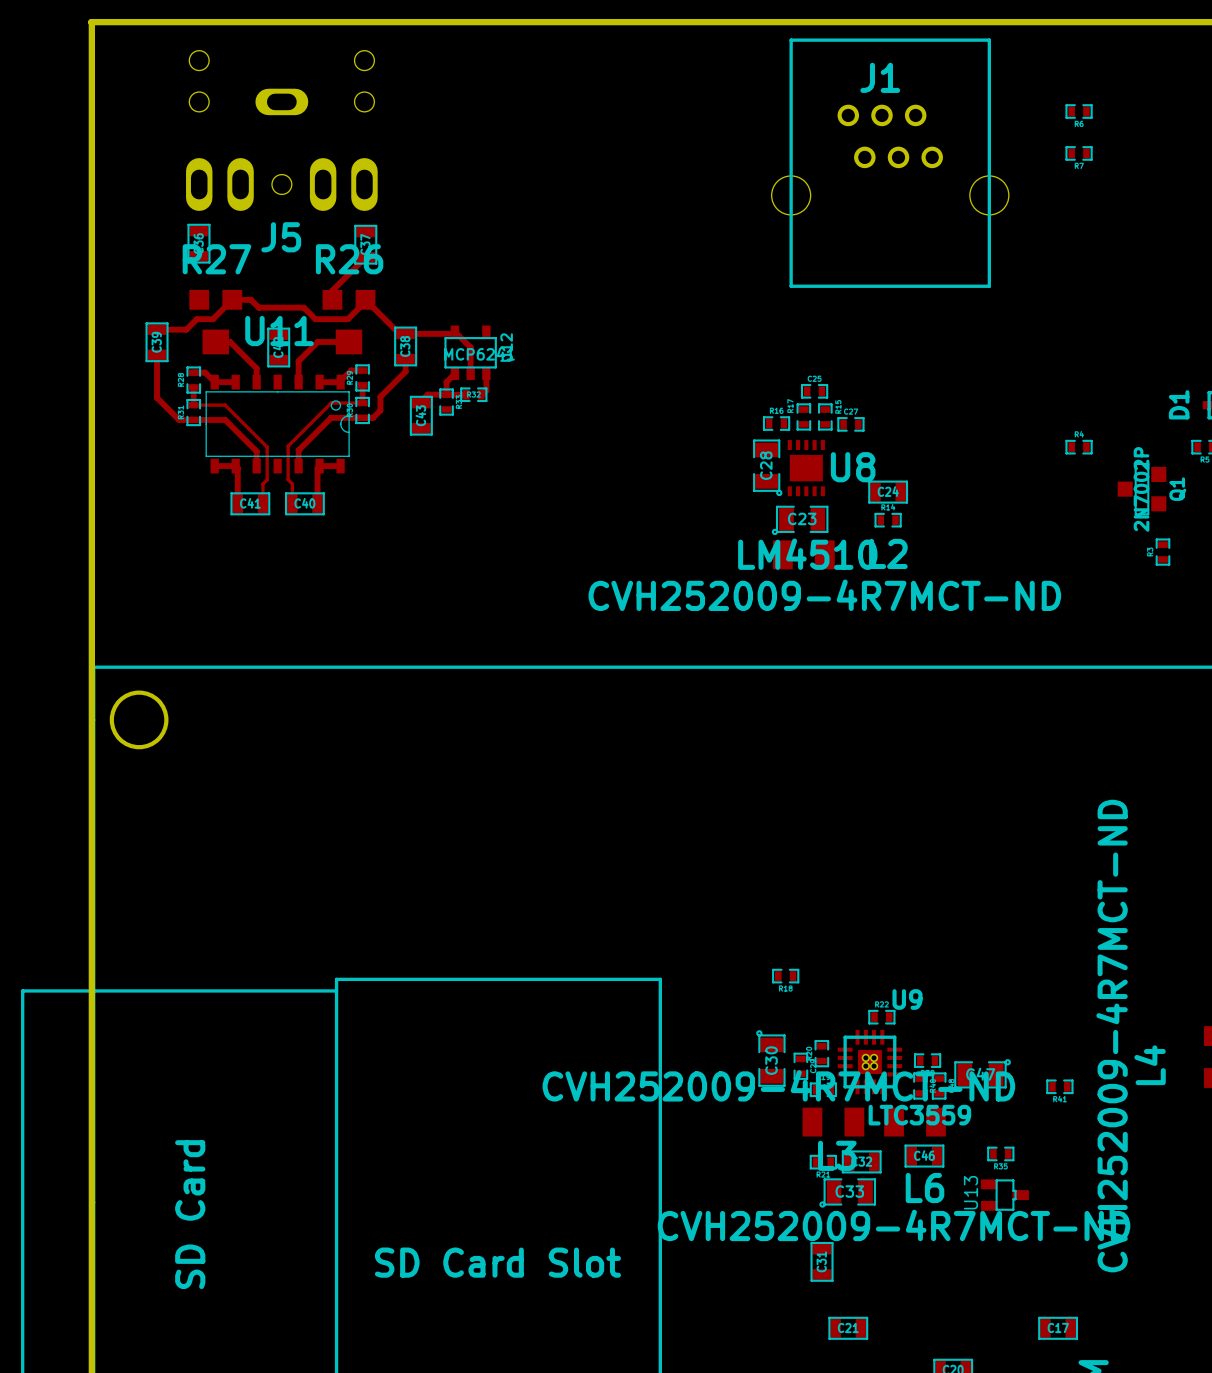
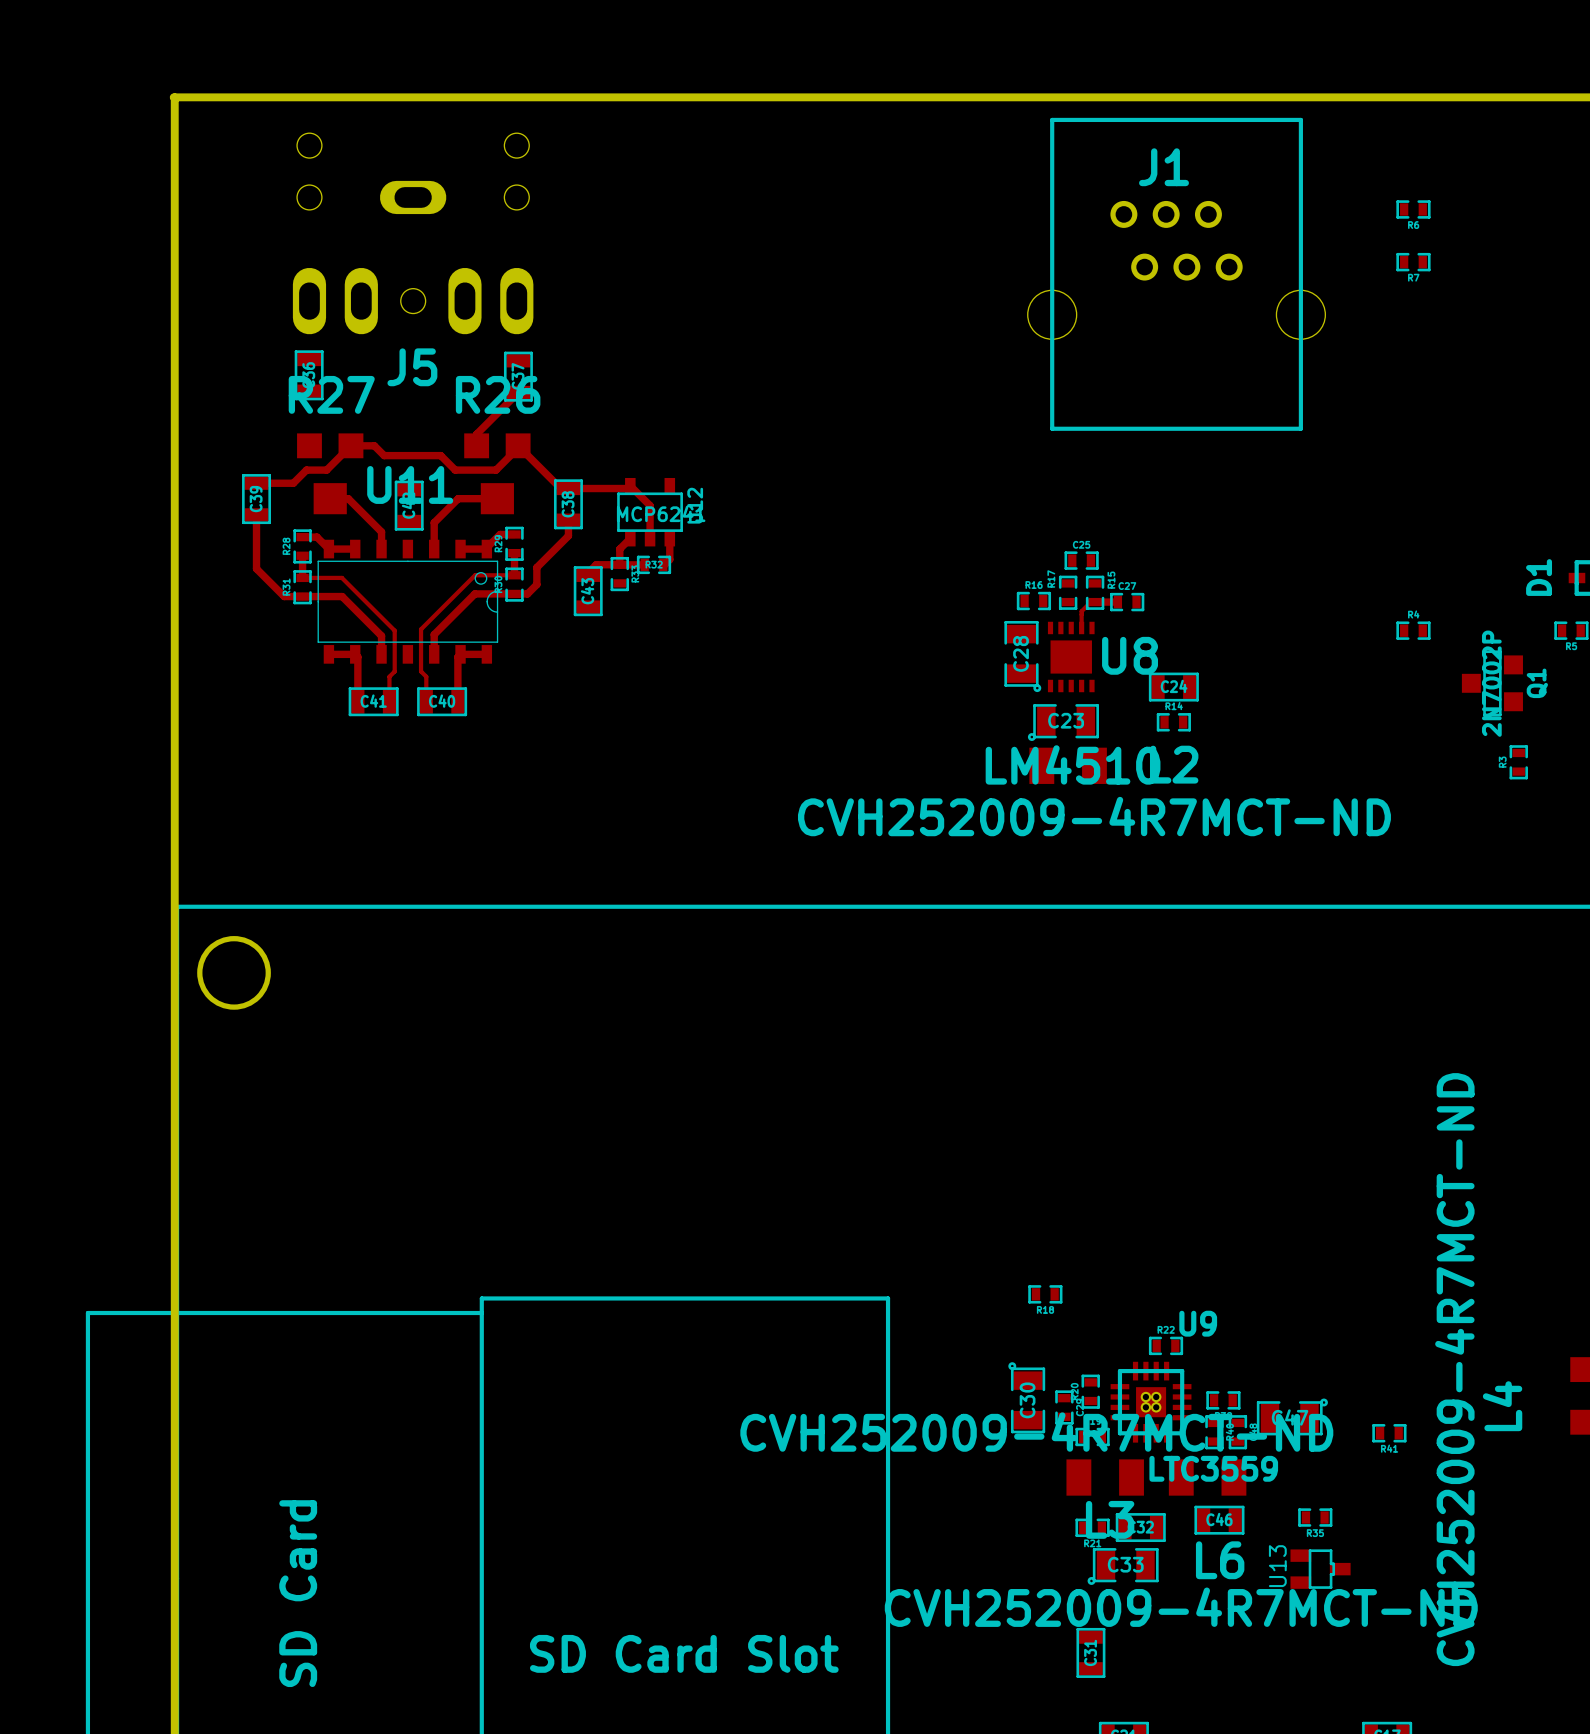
top track: none -> (1115, 602) (1090, 602) (1081, 611) (1081, 627)

